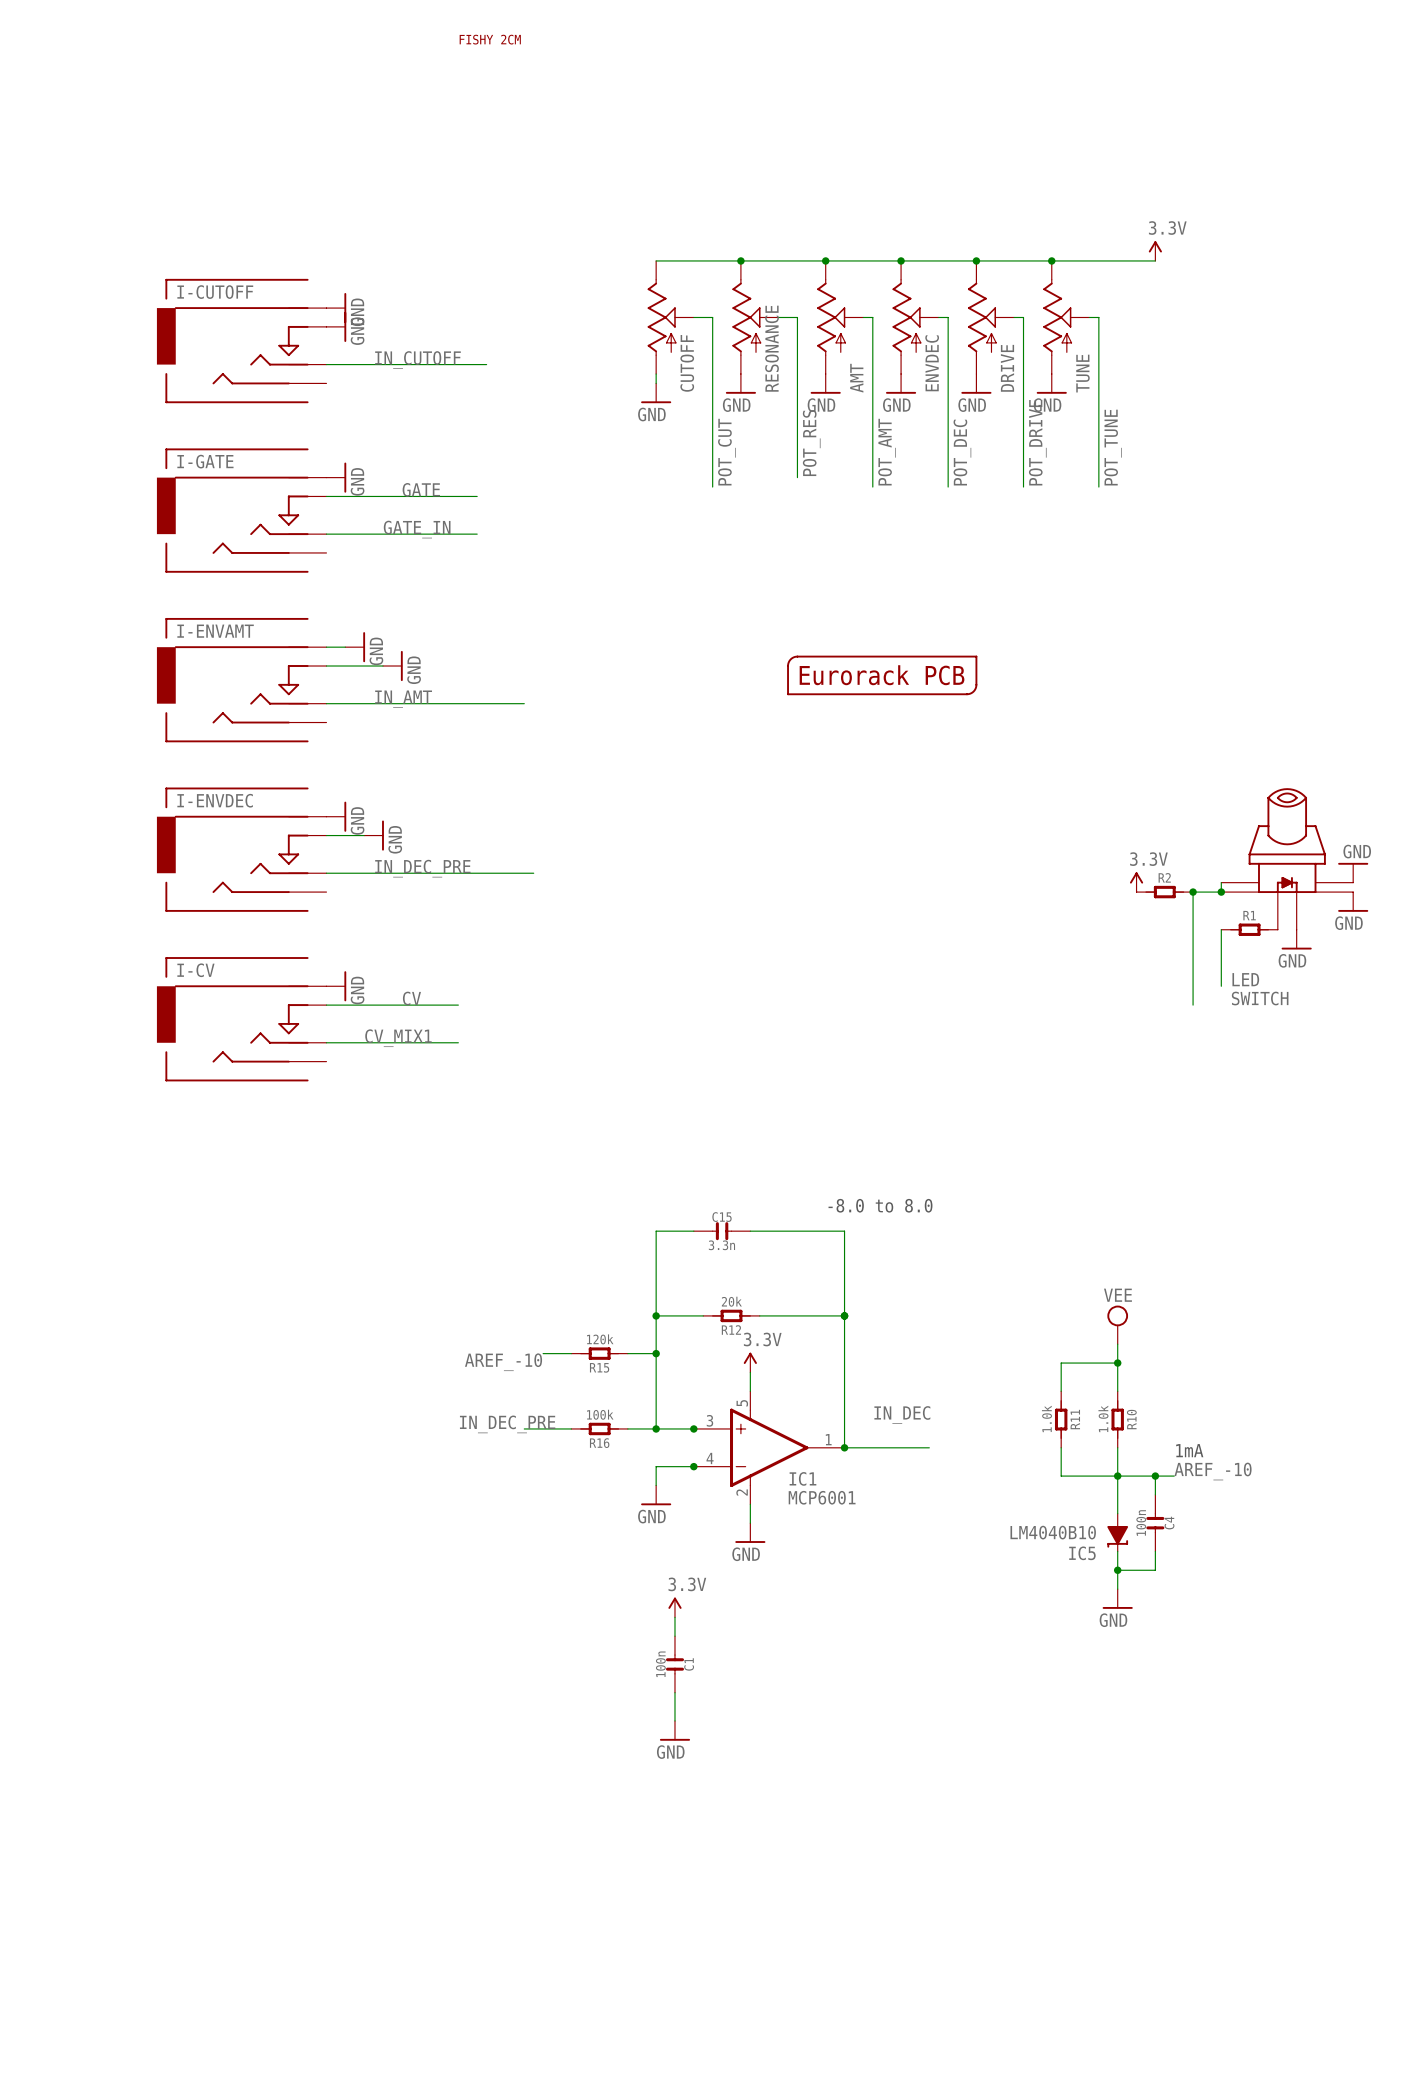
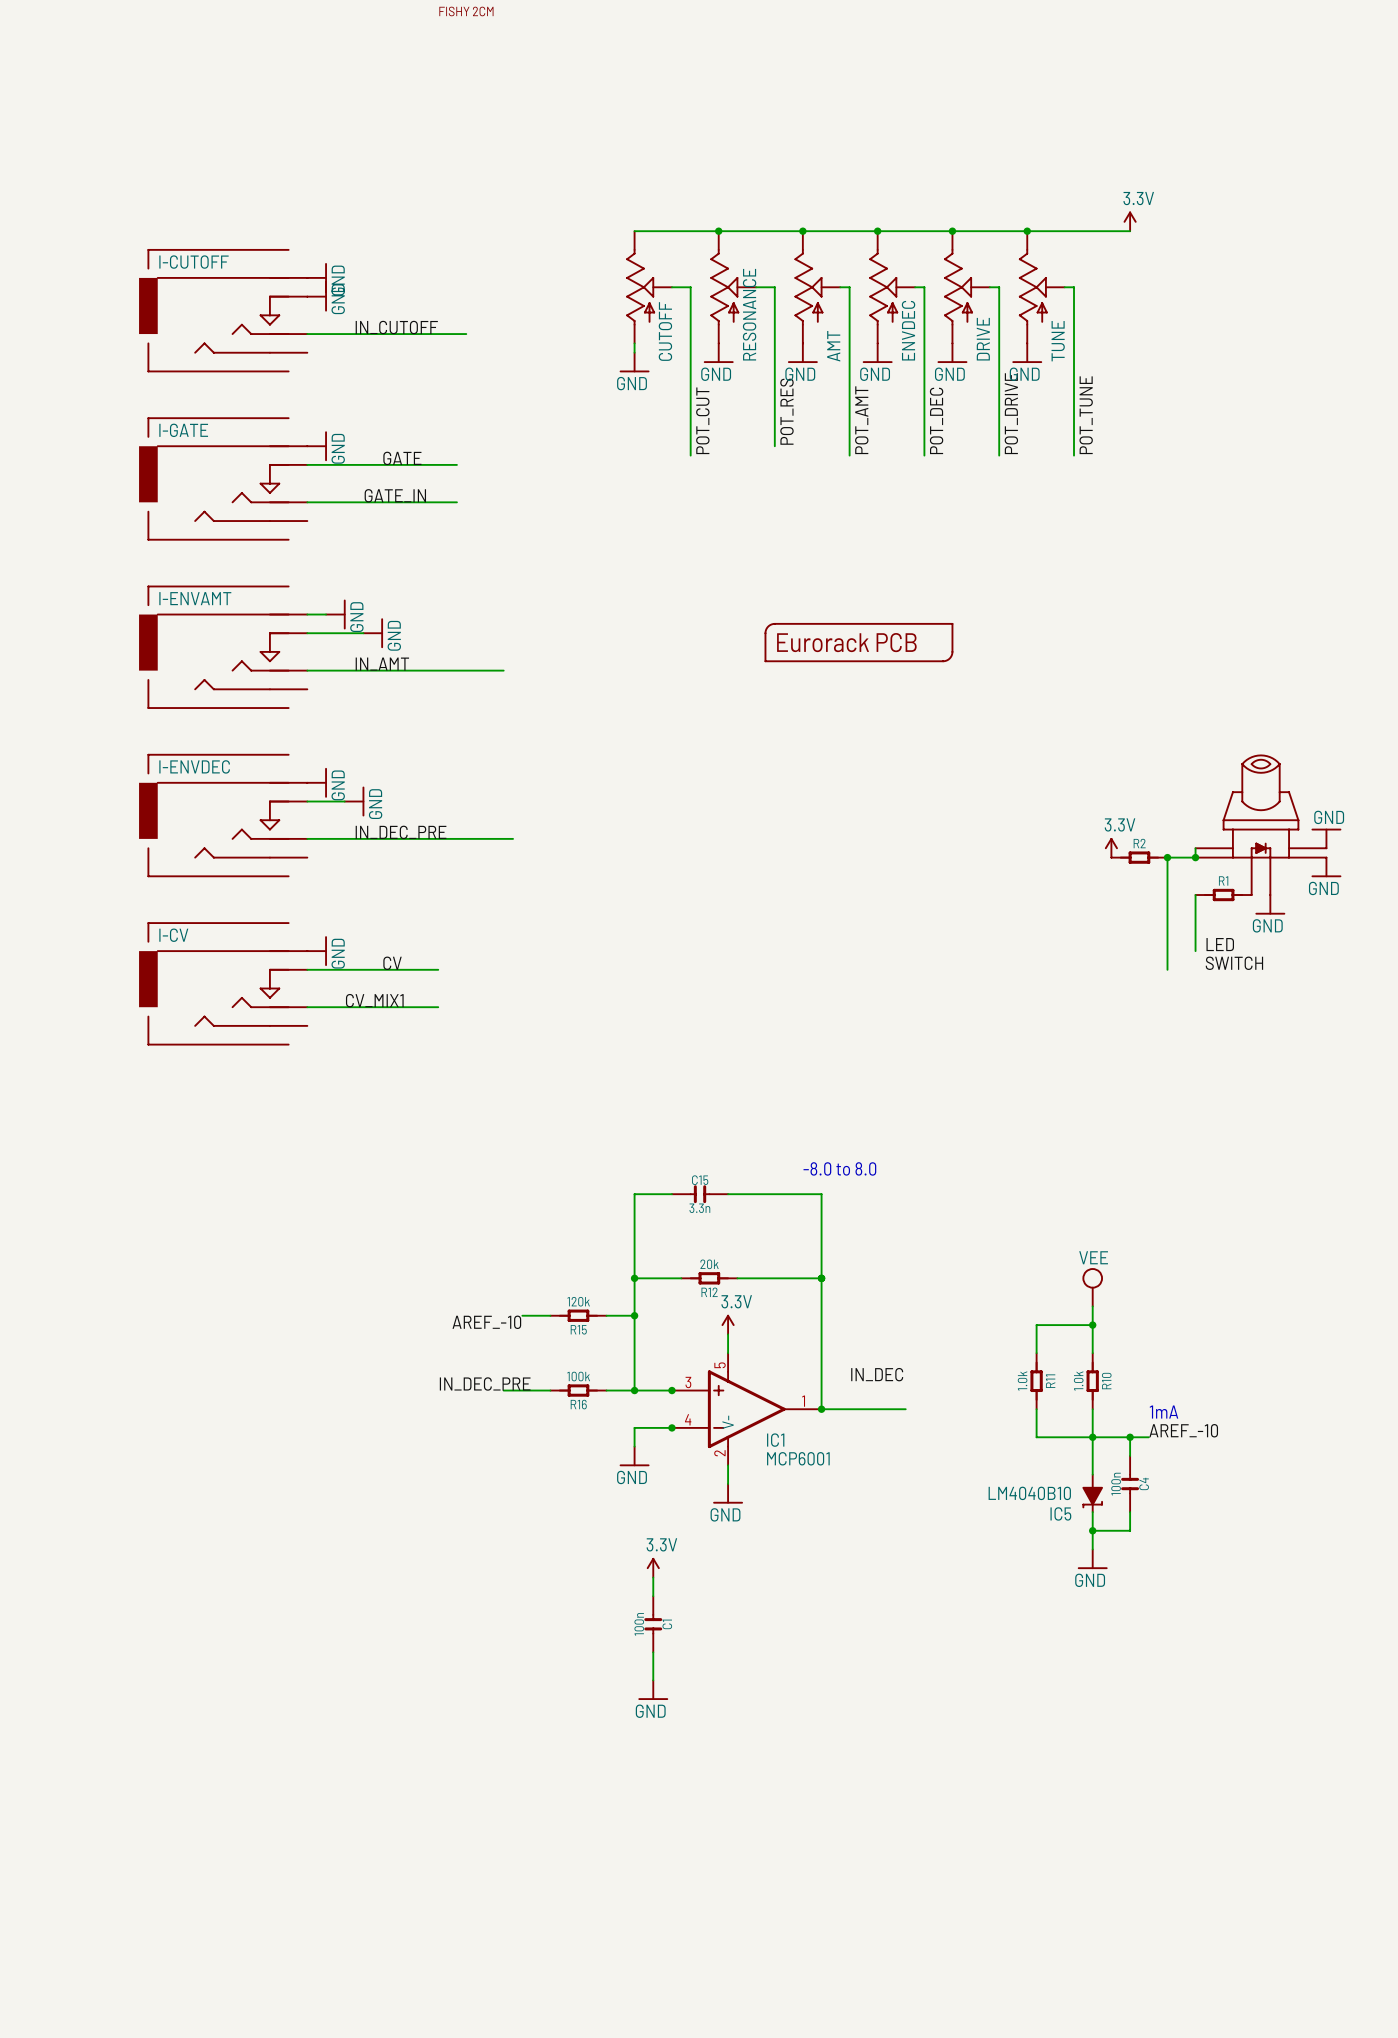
IC1 pin name: none -> V- (728, 1422)

